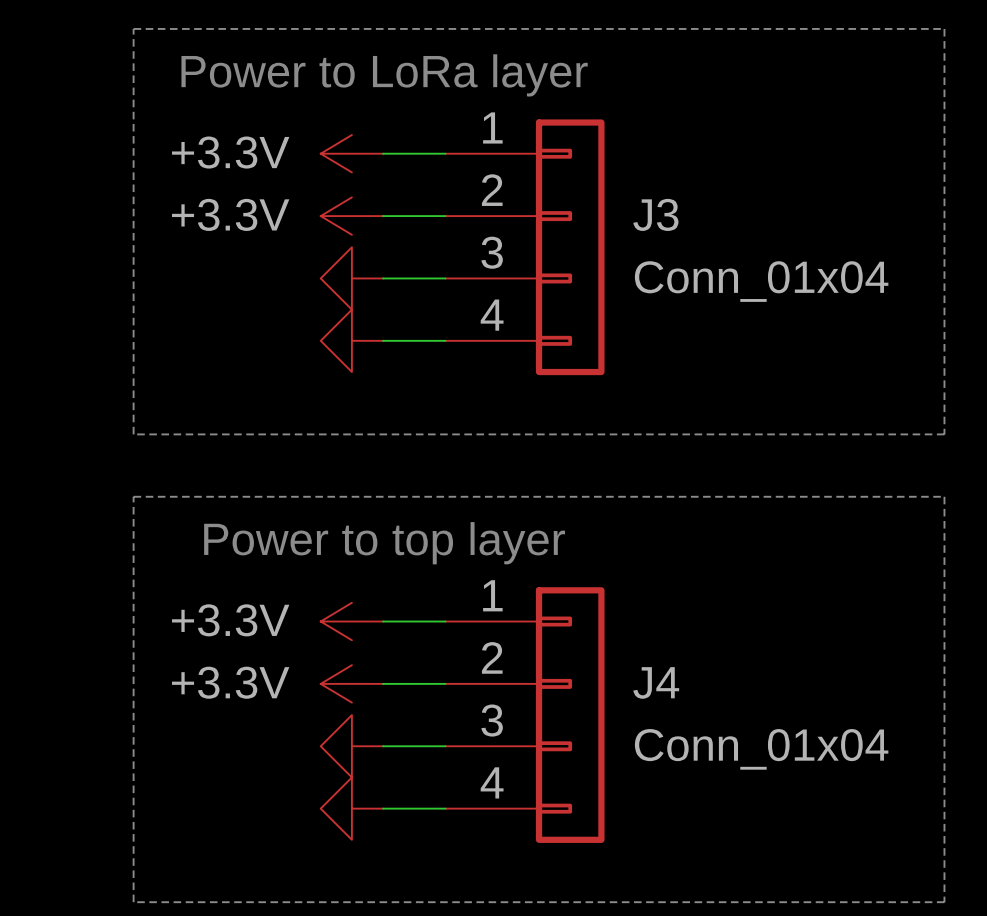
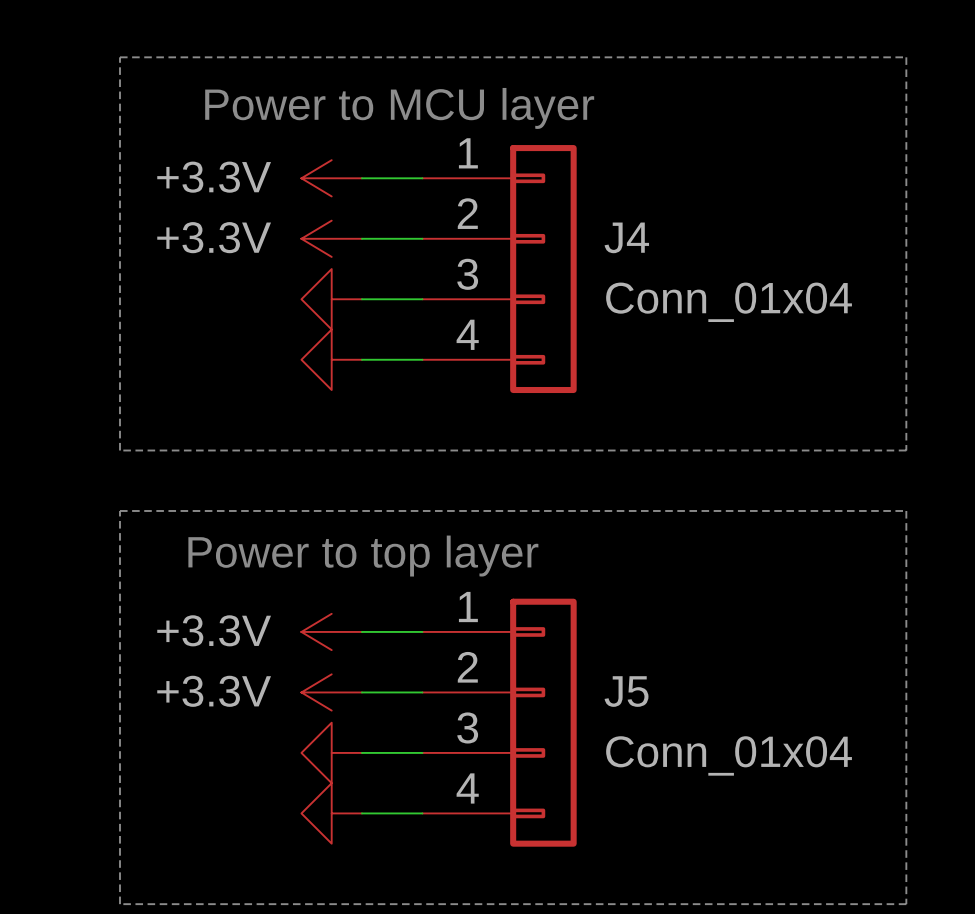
text: Power to LoRa layer (384, 75) -> Power to MCU layer (399, 108)
J3 name: J3 (655, 214) -> J4 (626, 237)
J4 name: J4 (656, 682) -> J5 (626, 691)

